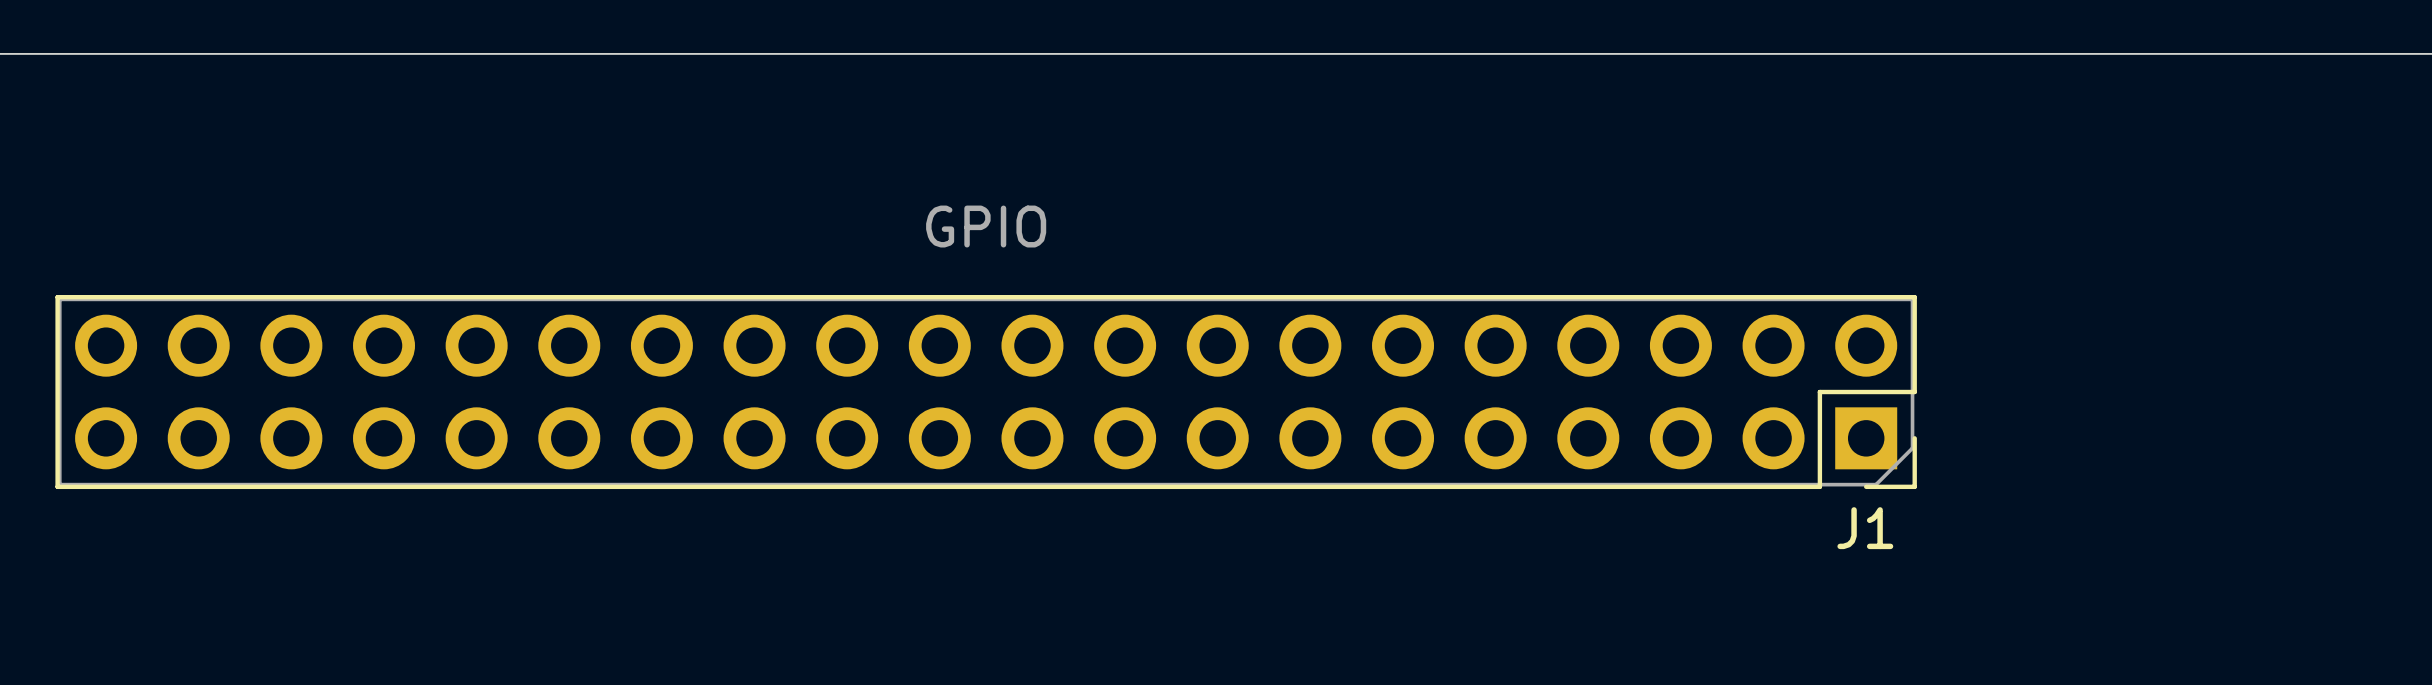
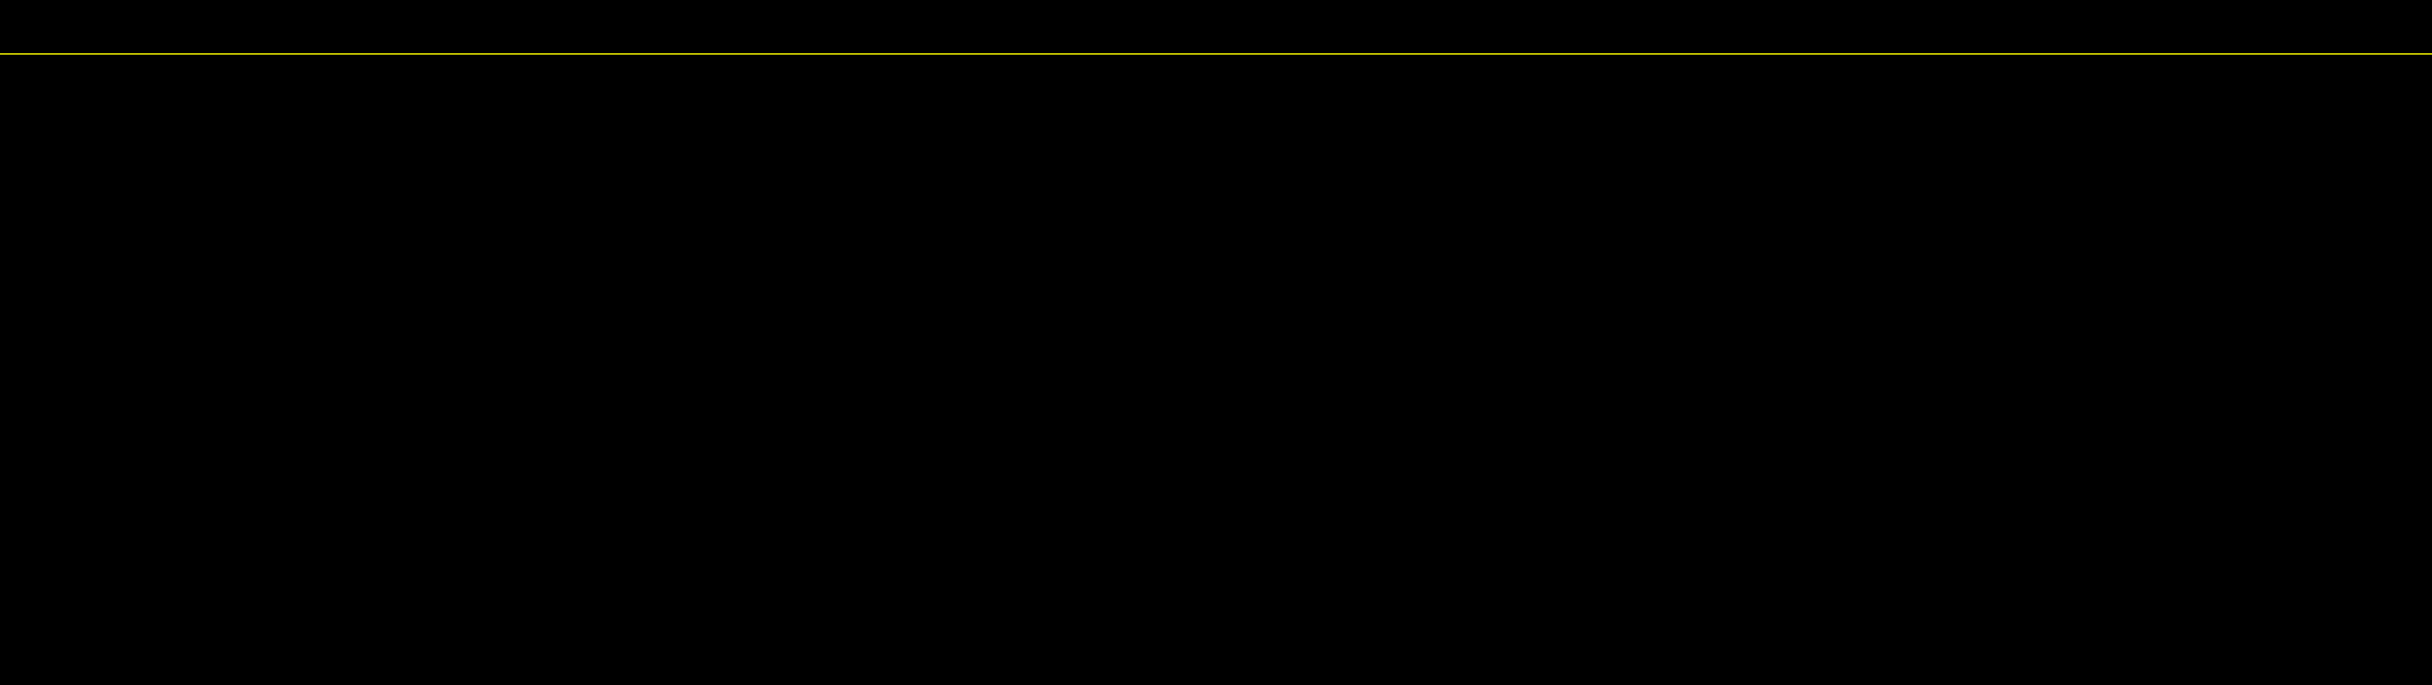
J1: GPIO (986, 392) -> none

